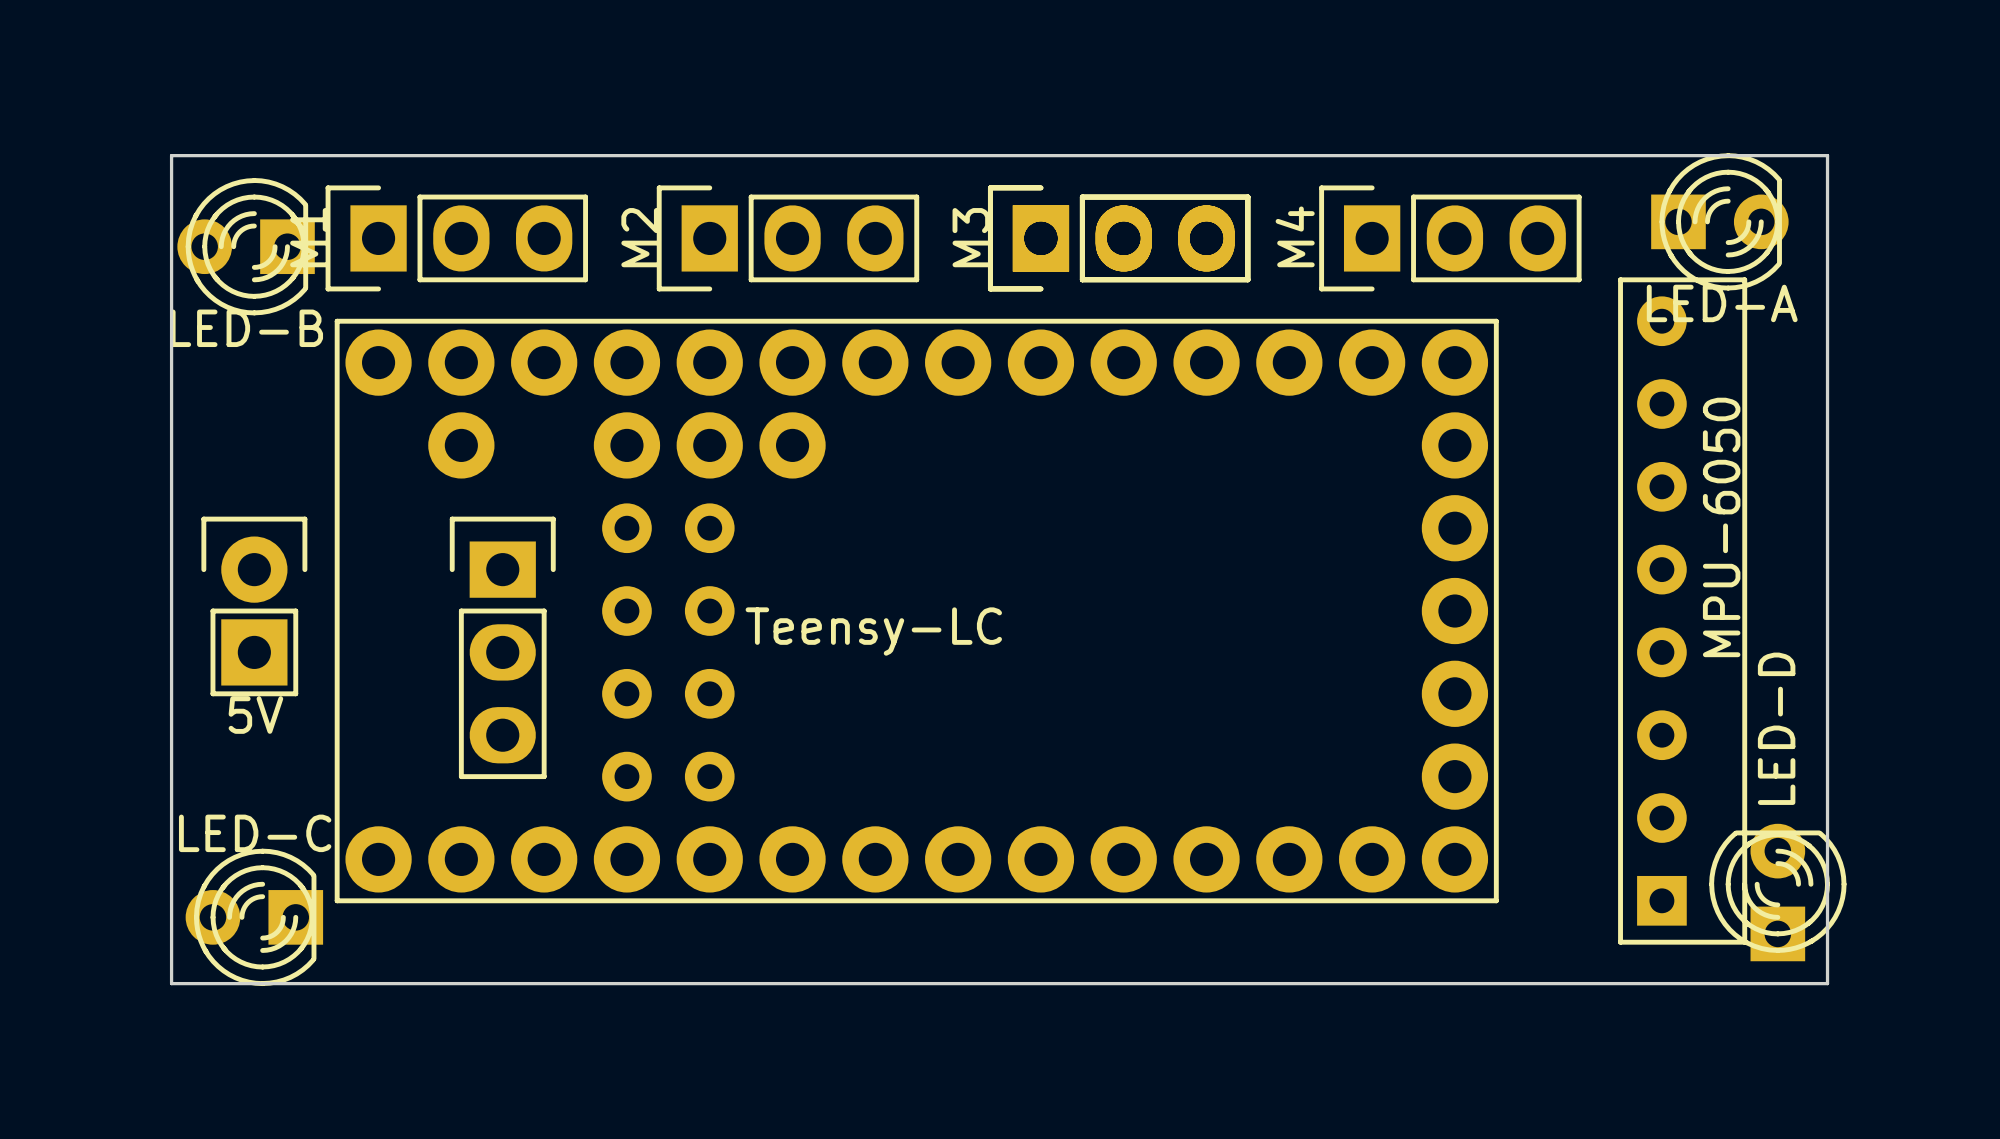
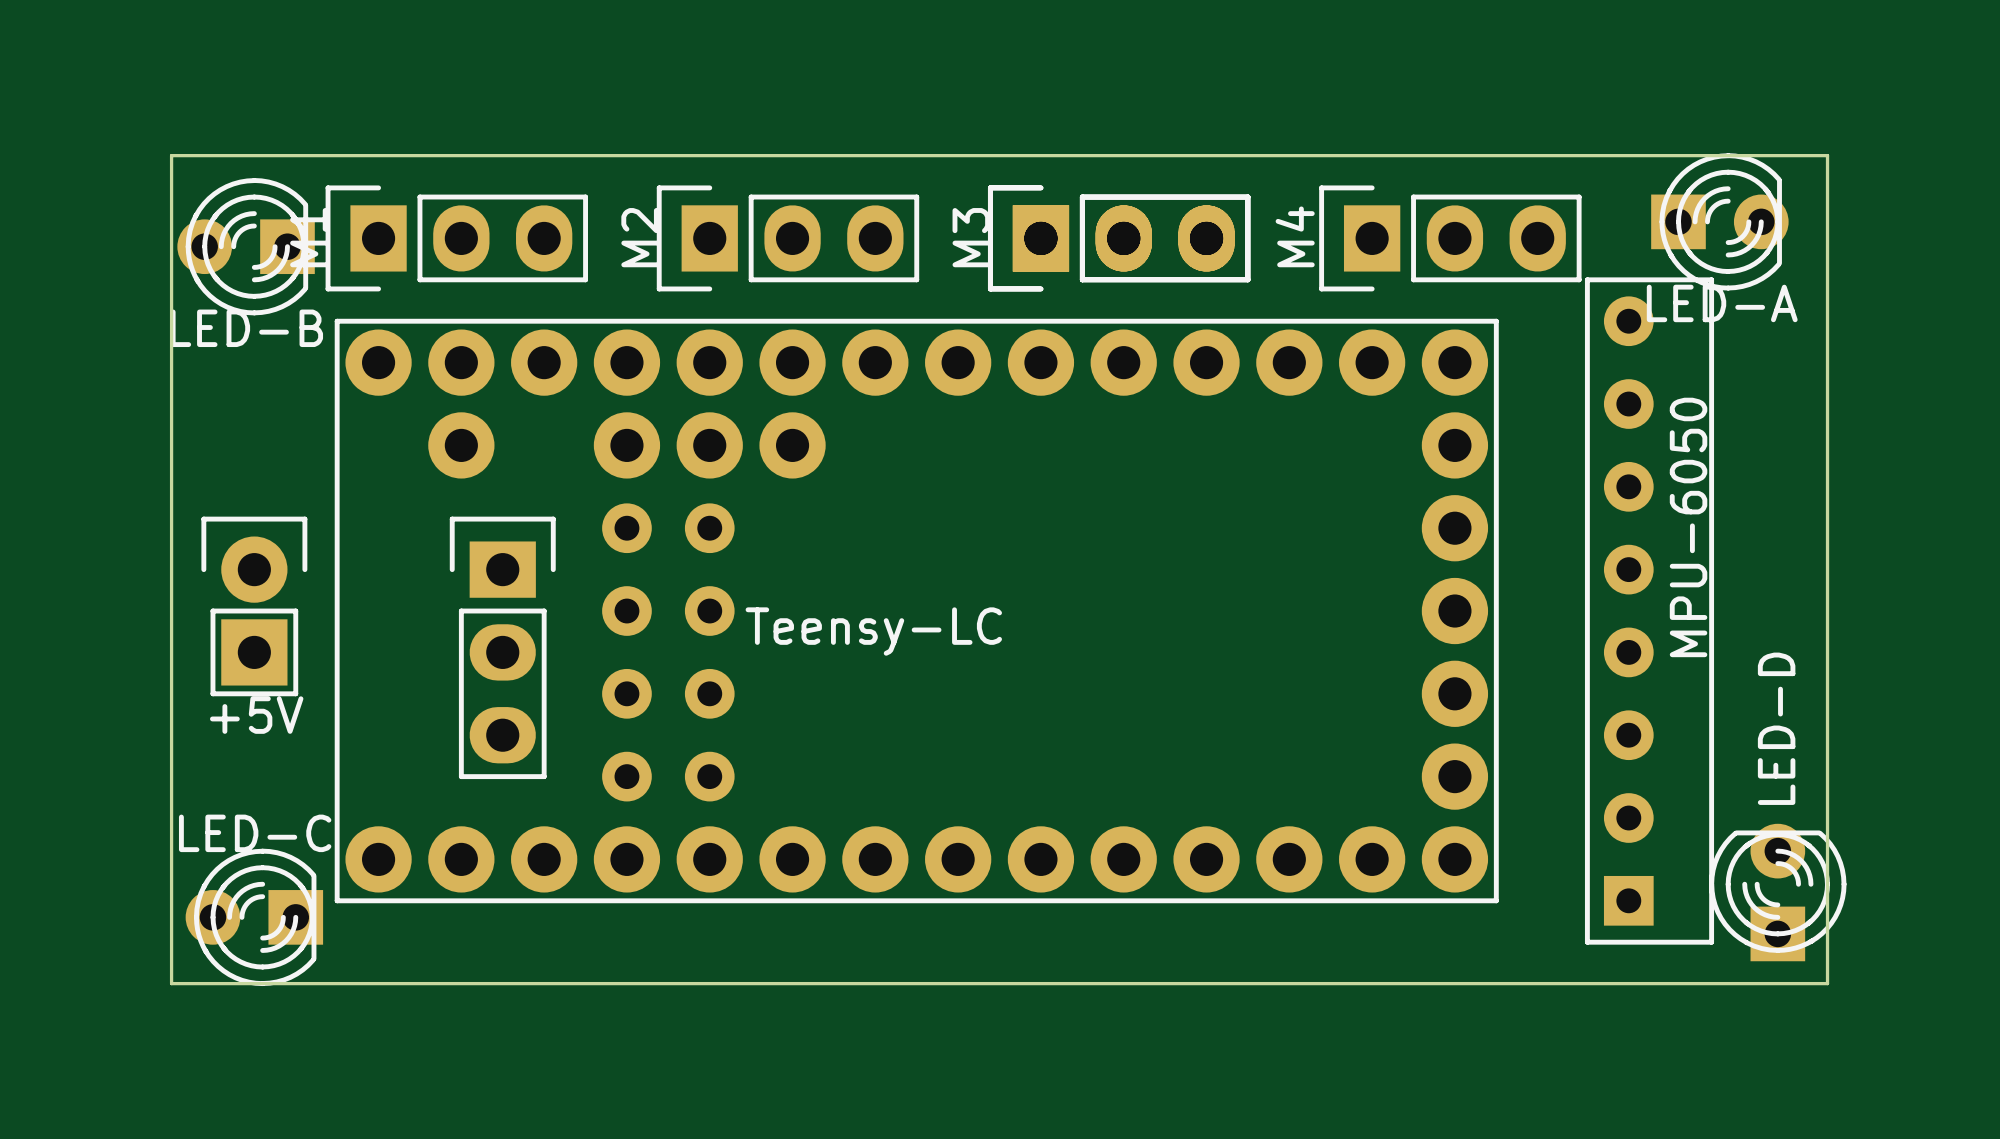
MPU-6050 position: (1682, 611) -> (1649, 611)
5V name: 5V (255, 715) -> +5V (256, 715)

